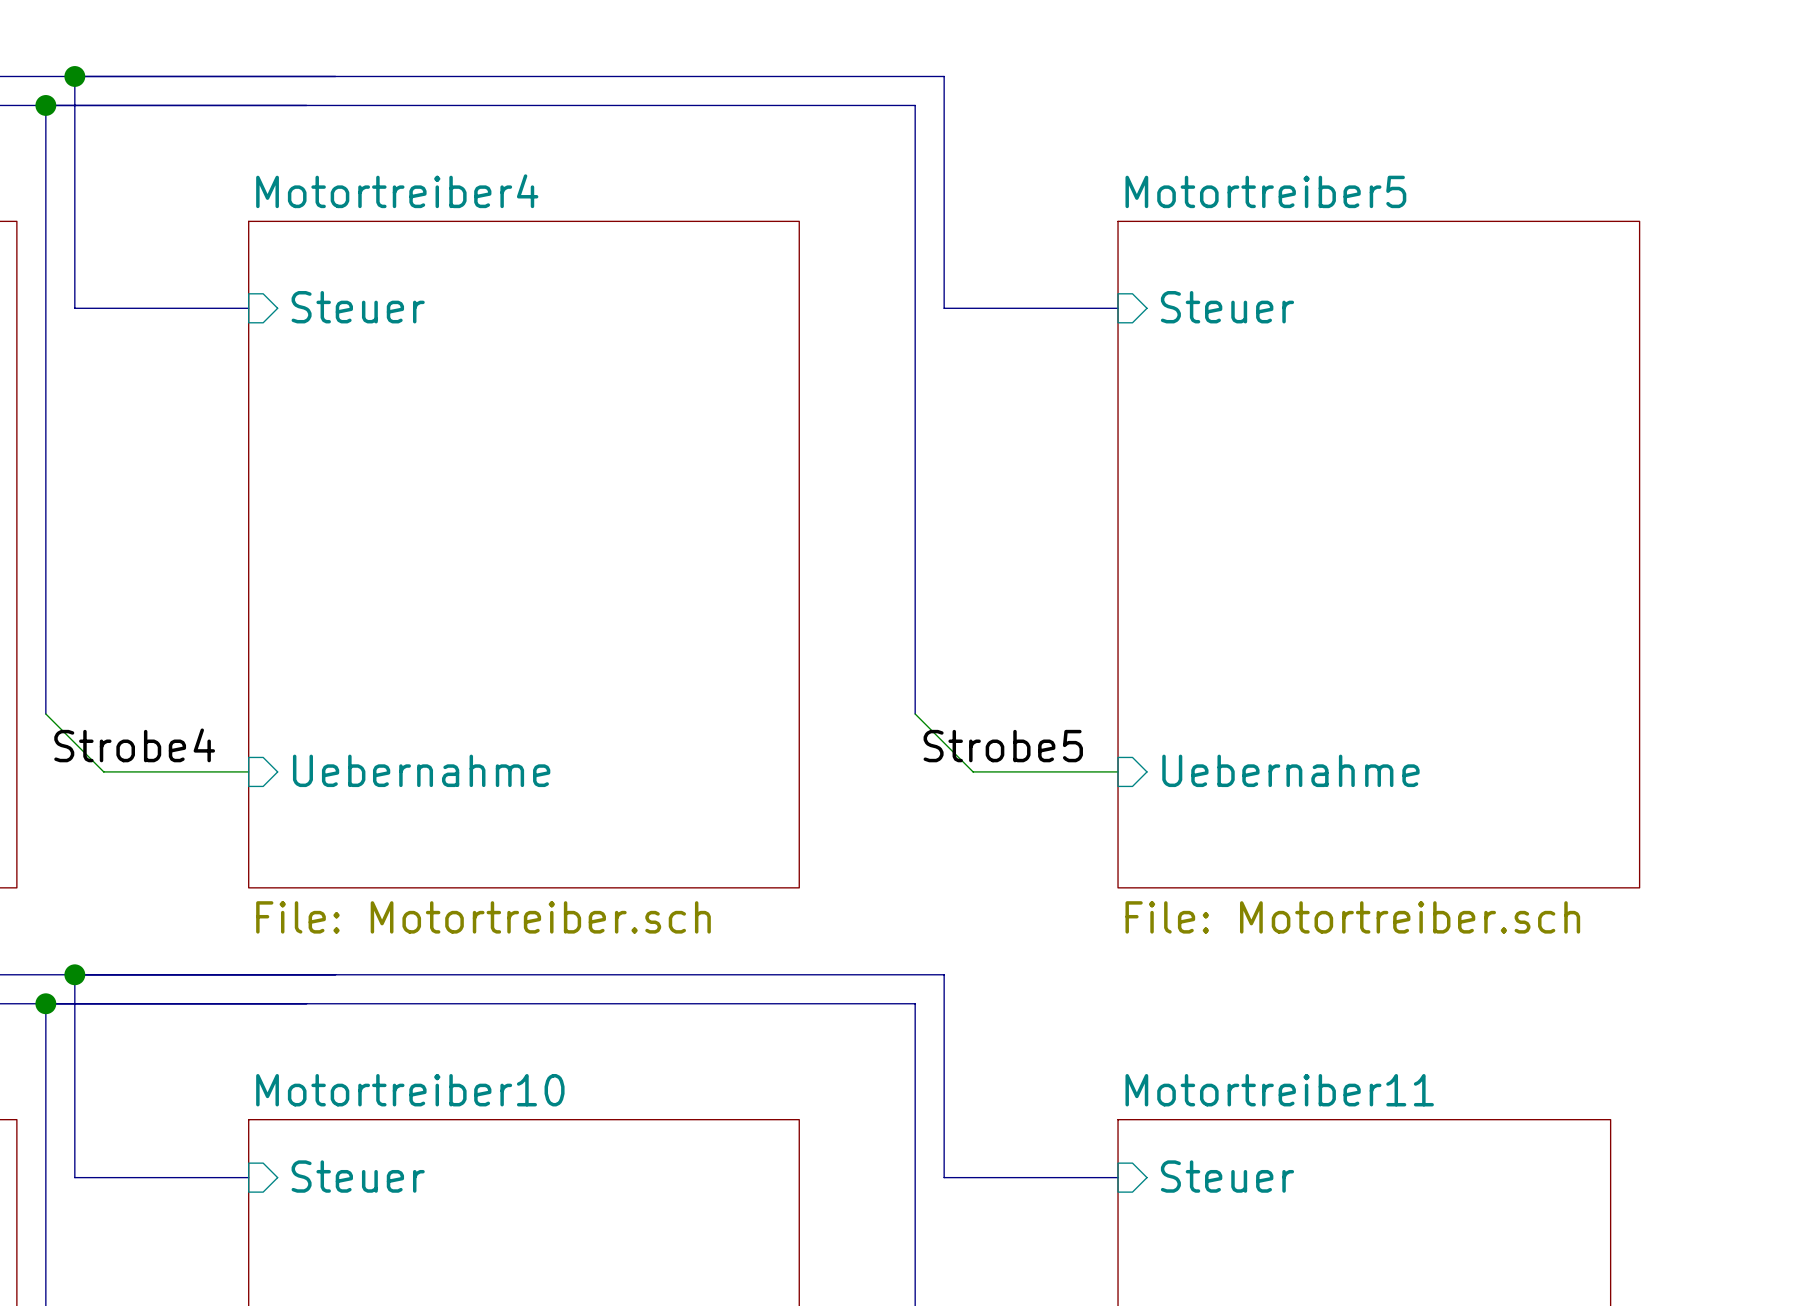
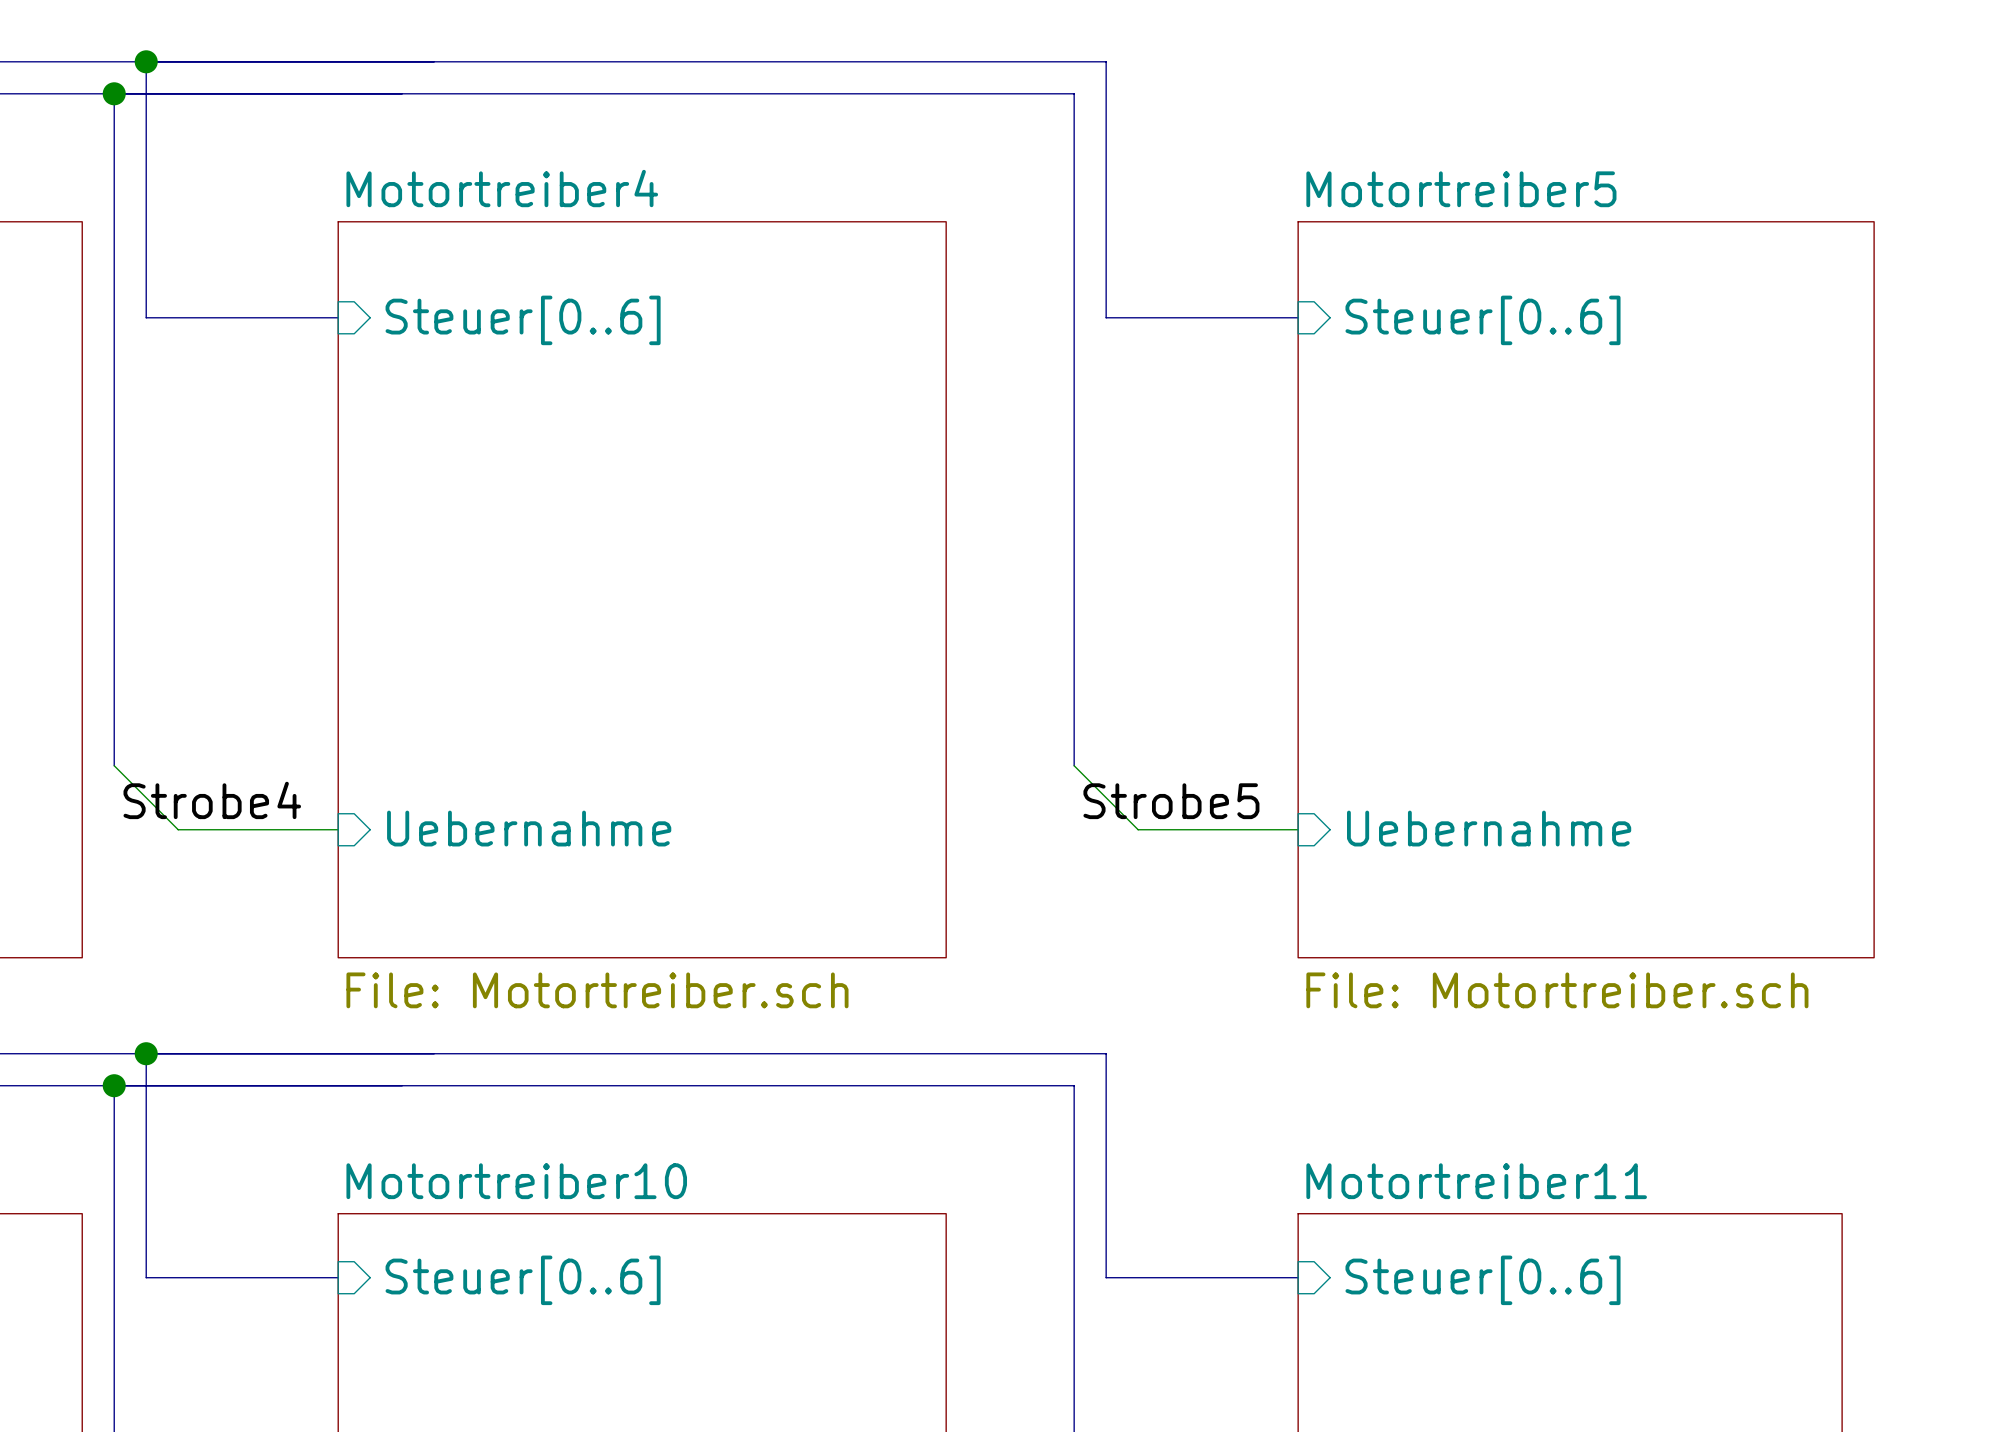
sheet pin: Steuer (358, 307) -> Steuer[0..6] (523, 320)
sheet pin: Steuer (1227, 307) -> Steuer[0..6] (1483, 320)
sheet pin: Steuer (358, 1176) -> Steuer[0..6] (523, 1280)
sheet pin: Steuer (1227, 1176) -> Steuer[0..6] (1483, 1280)

